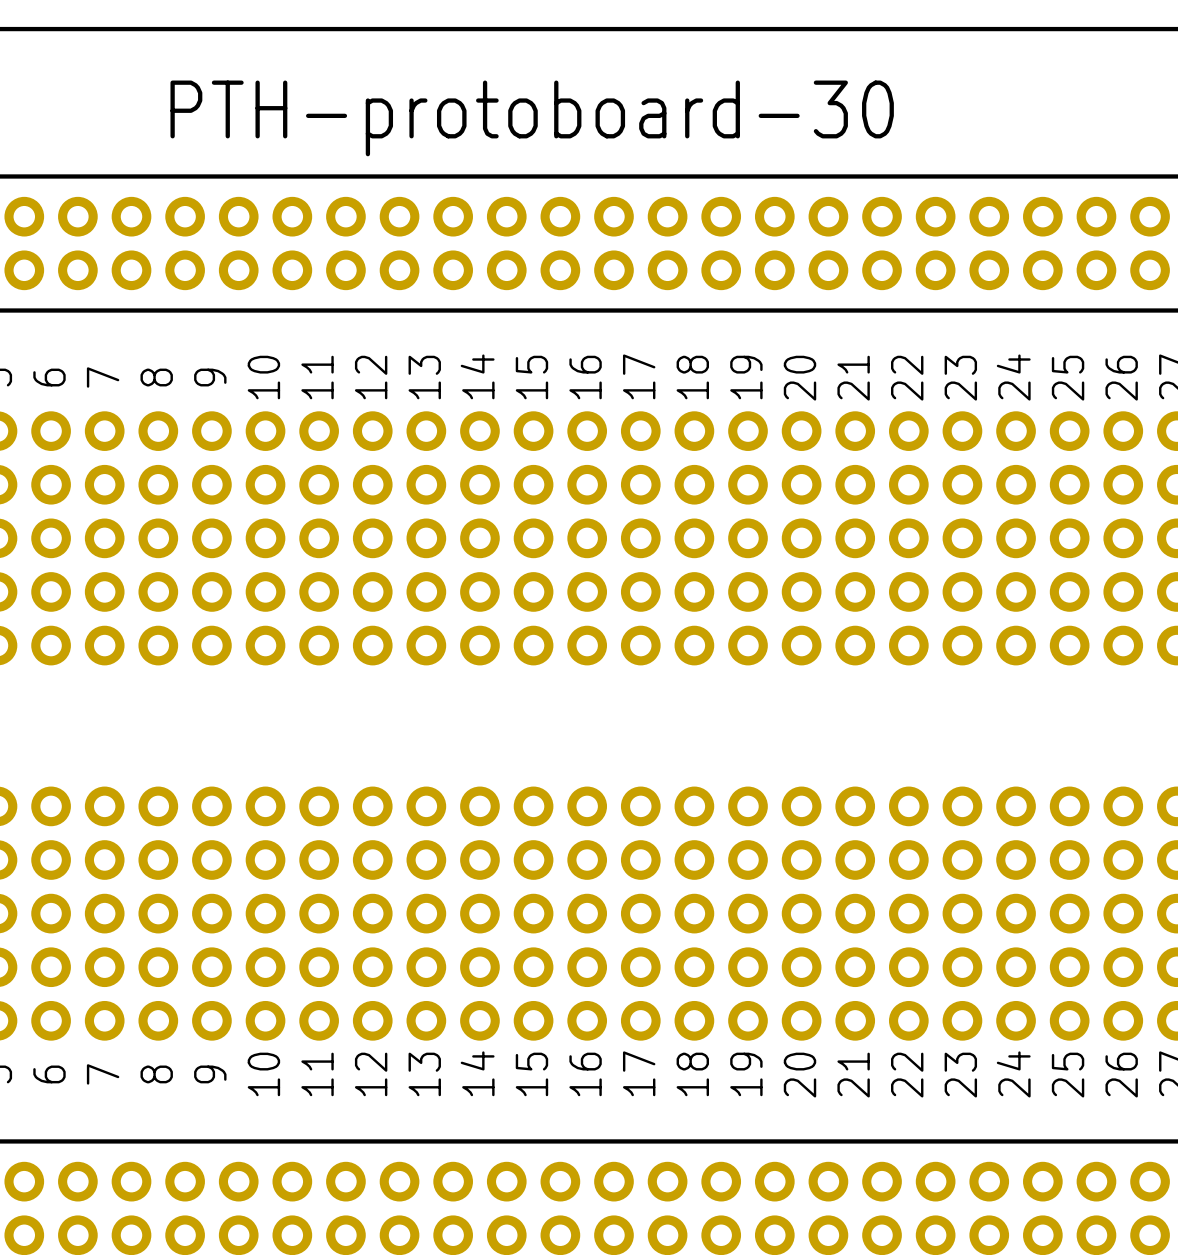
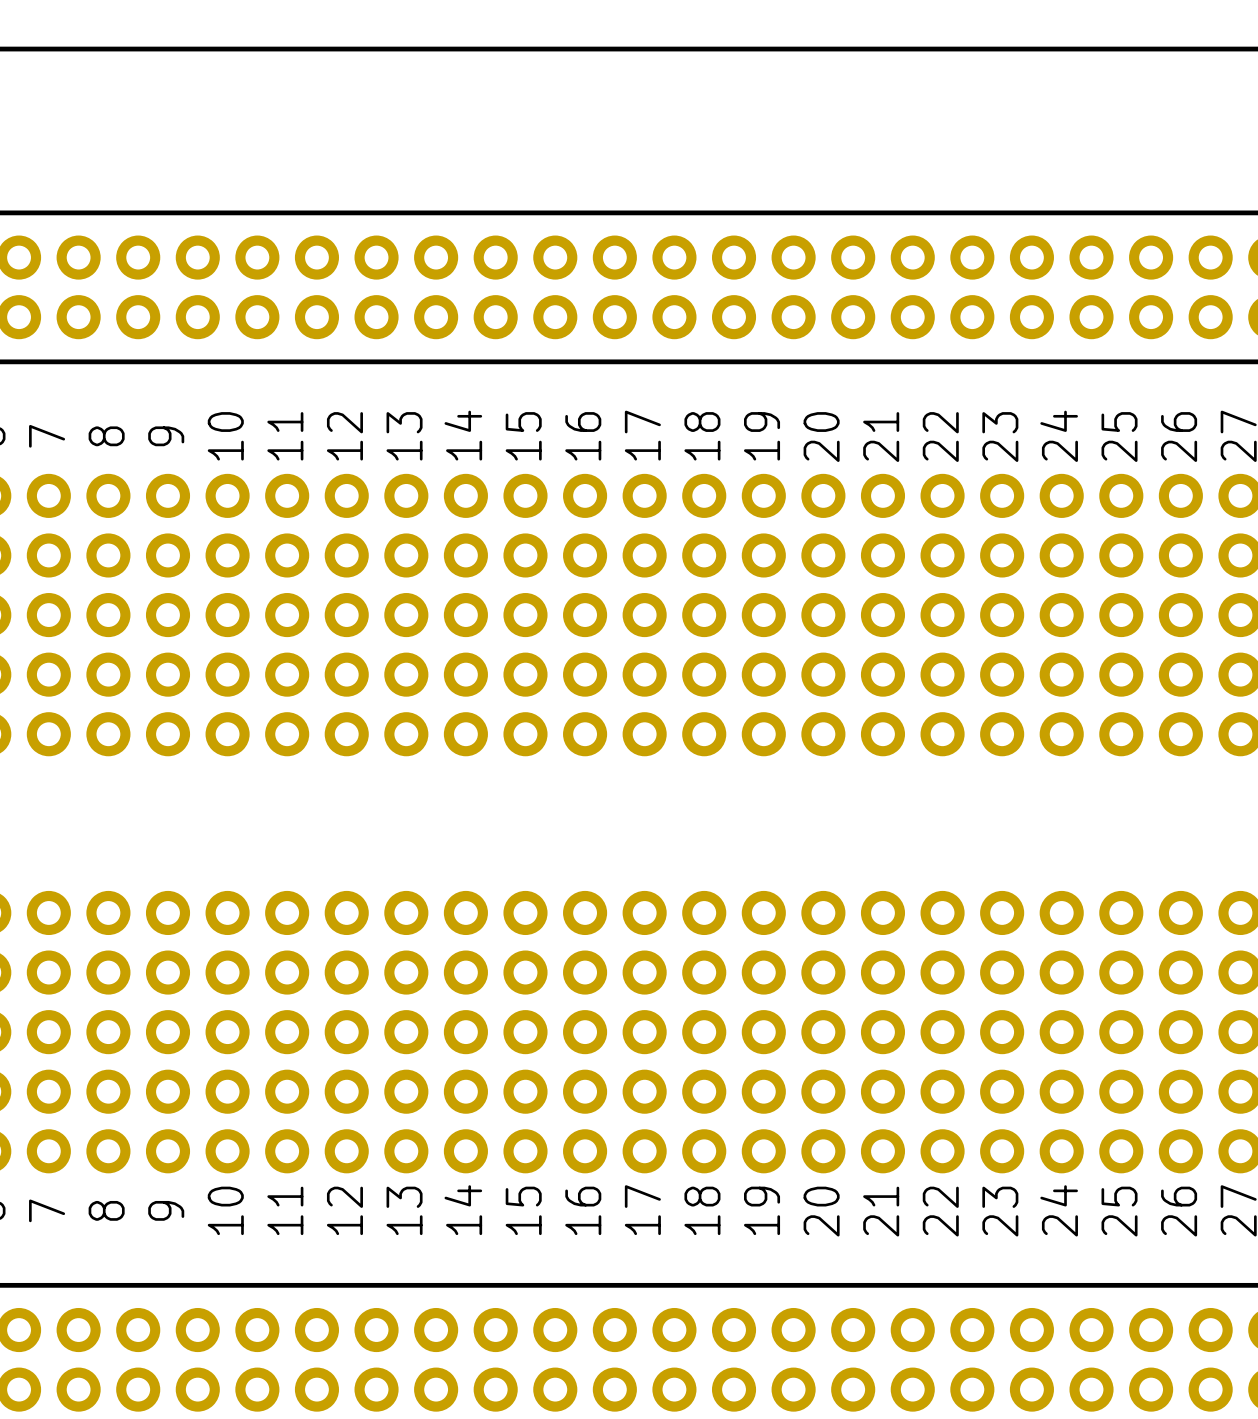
text: PTH-protoboard-30 (532, 118) -> none

